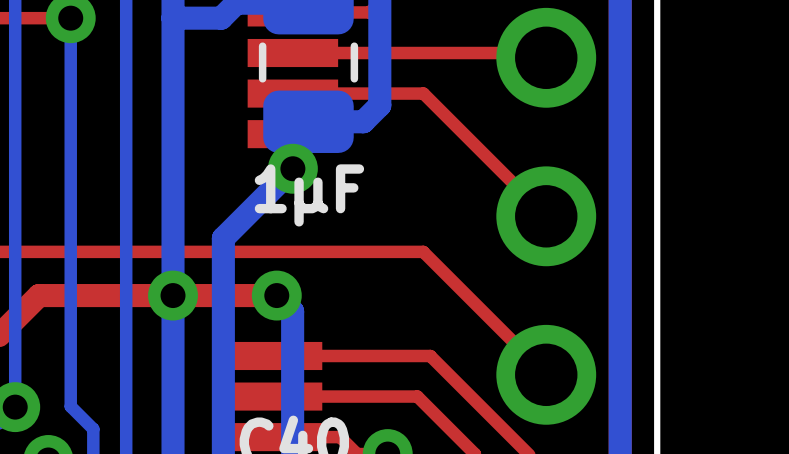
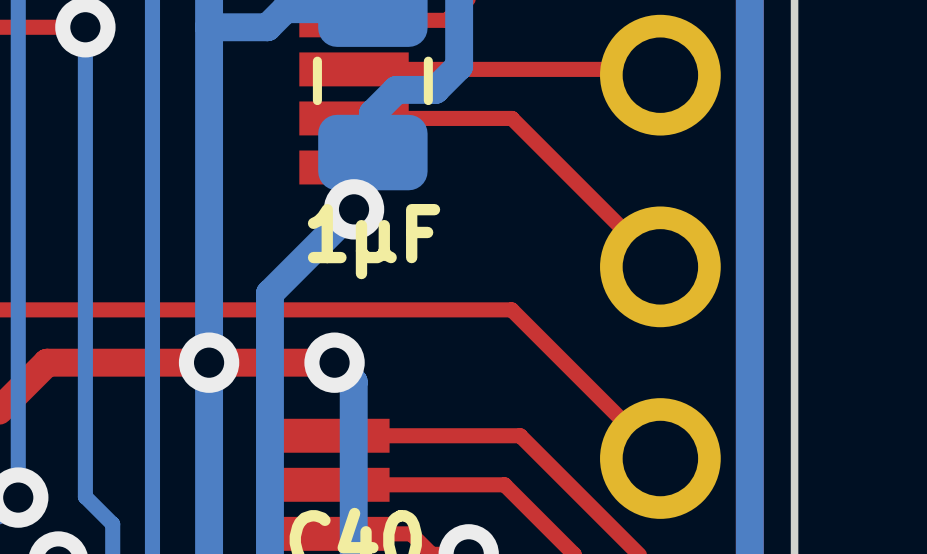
bottom track: (379, 50) (379, 105) (363, 121) (308, 121) -> (459, 66) (435, 89) (396, 89) (372, 113) (372, 152)

